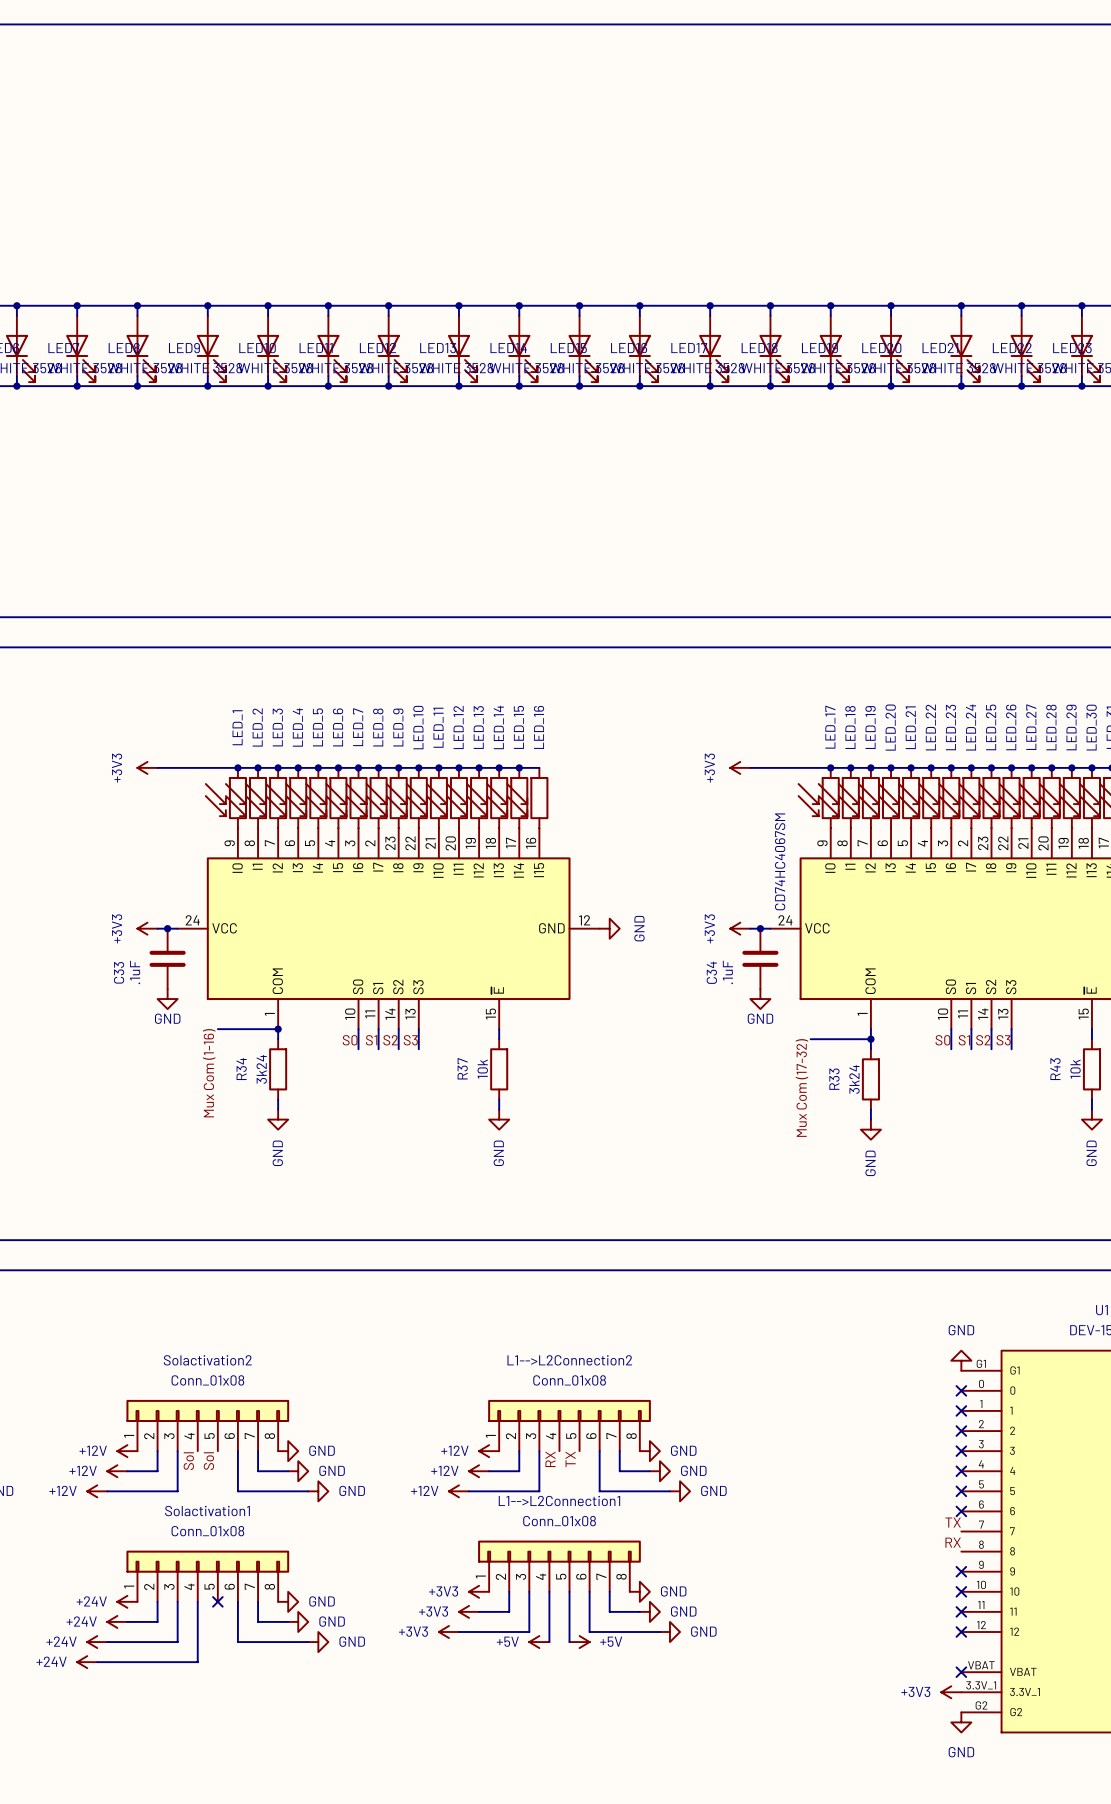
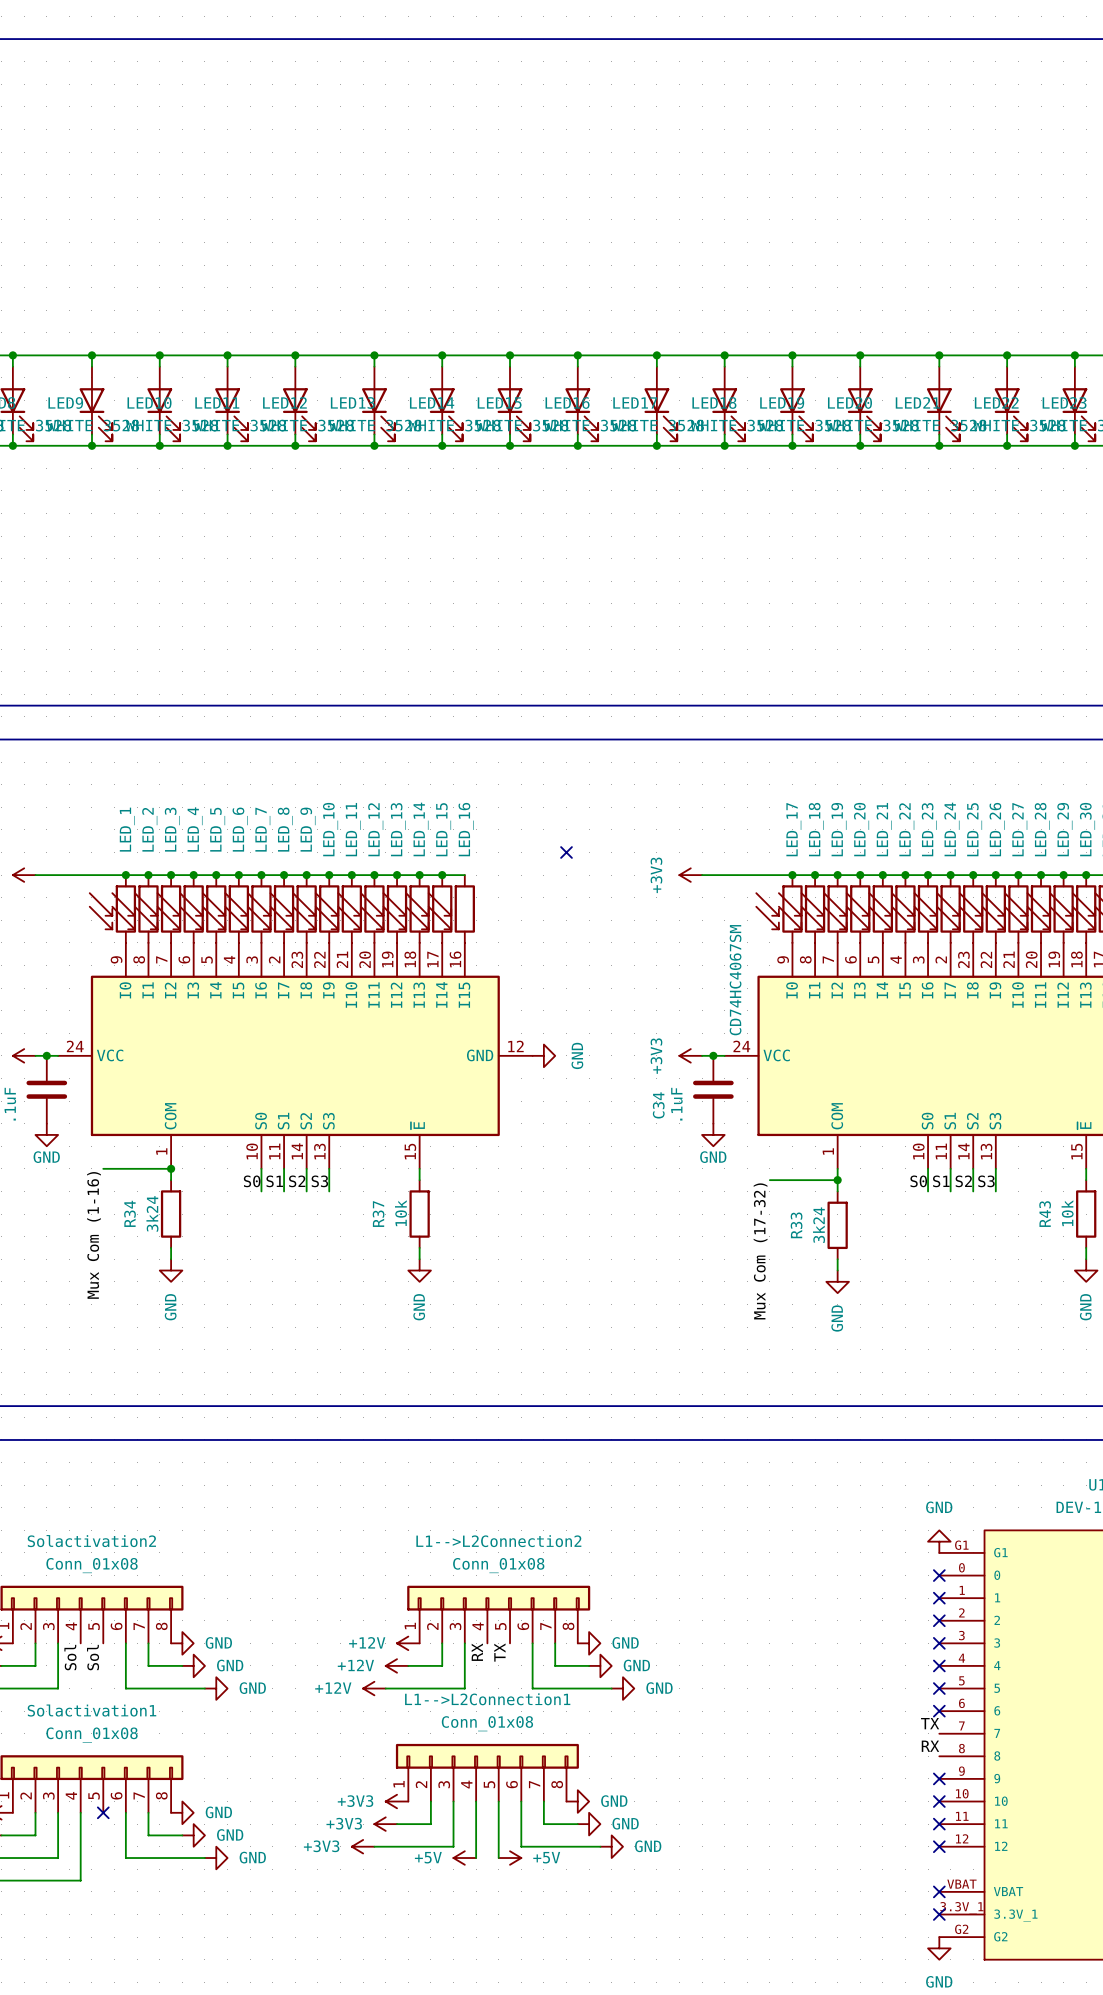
no-connect mark: none -> (566, 852)
power symbol: +3V3 (951, 1692) -> none
no-connect mark: none -> (939, 1914)

